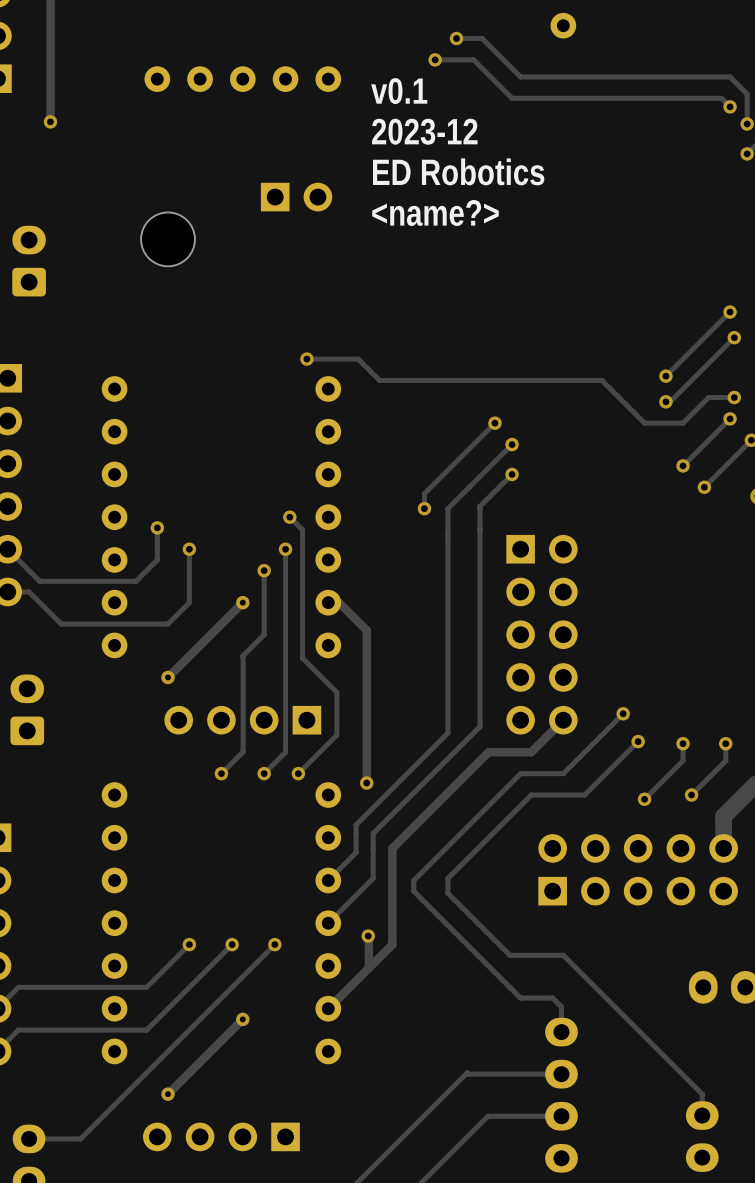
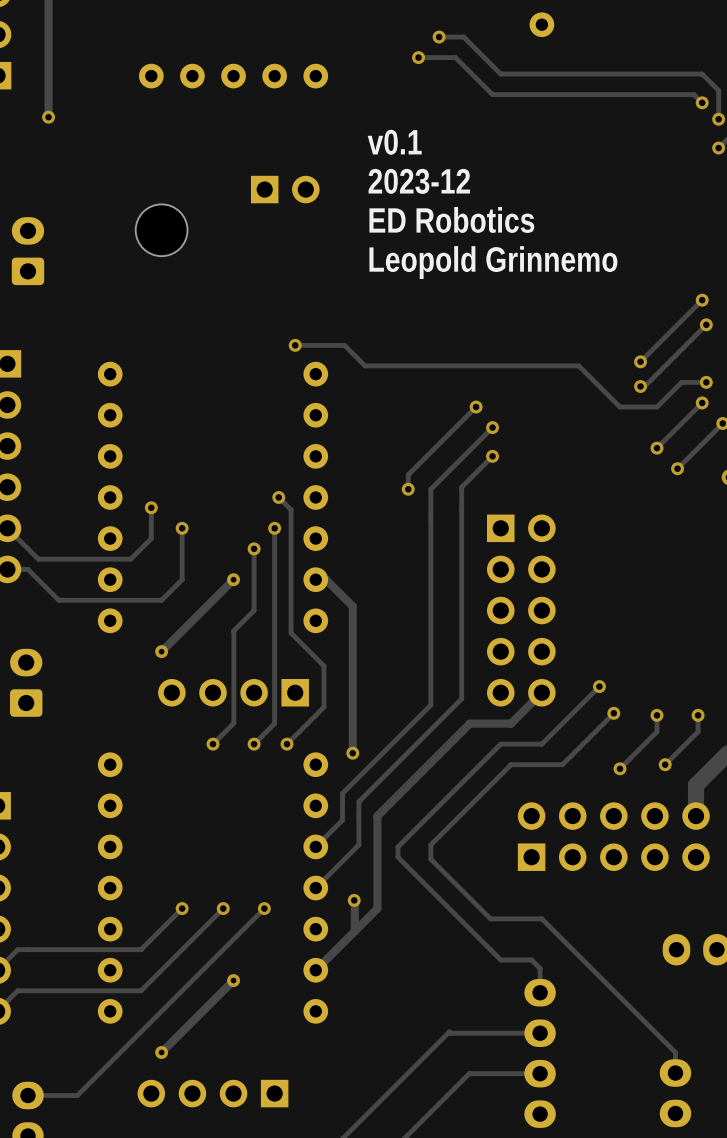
text position: v0.1 (399, 91) -> v0.1 (394, 142)
text position: 2023-12 (424, 131) -> 2023-12 (419, 181)
text position: ED Robotics (458, 171) -> ED Robotics (451, 219)
text: <name?> (435, 212) -> none
text: none -> Leopold Grinnemo (493, 262)

